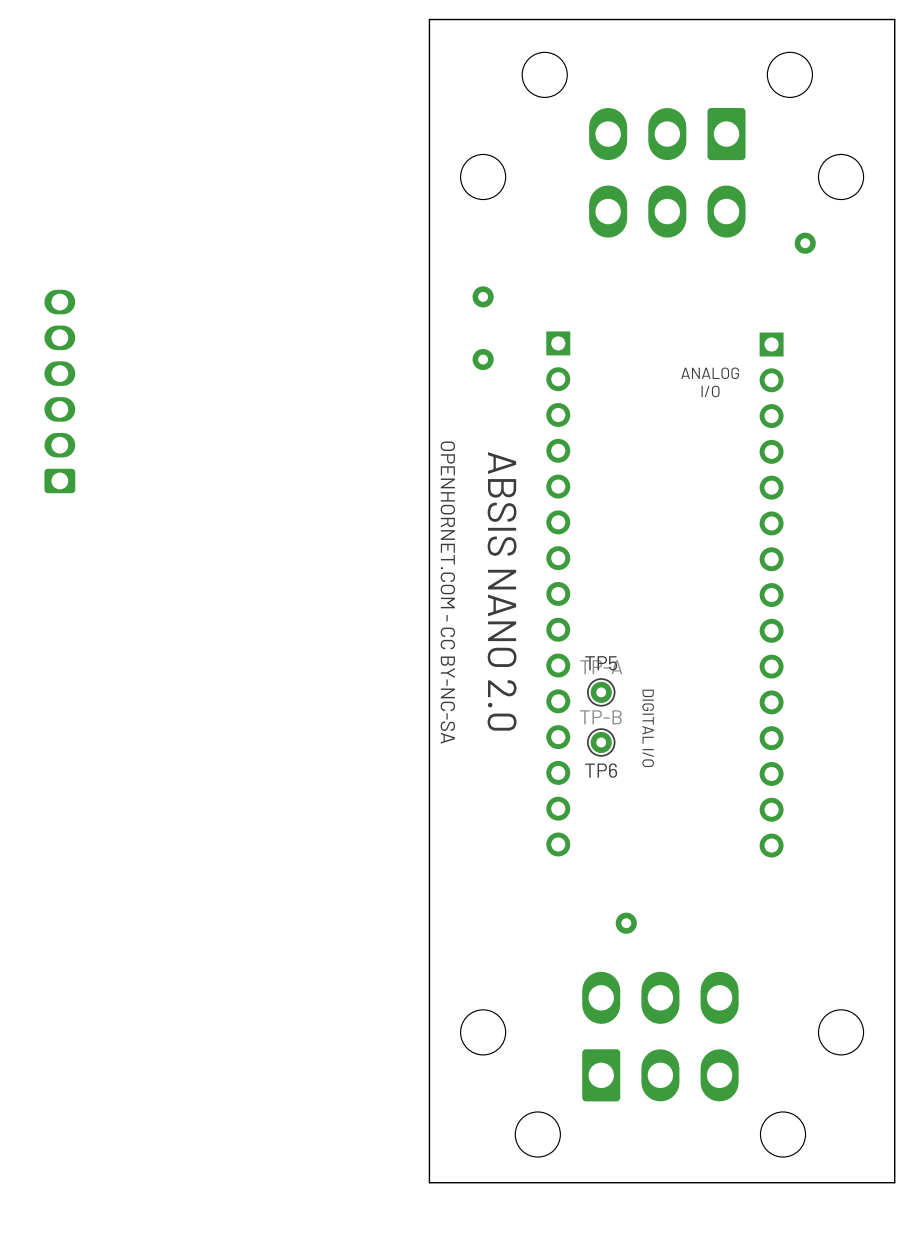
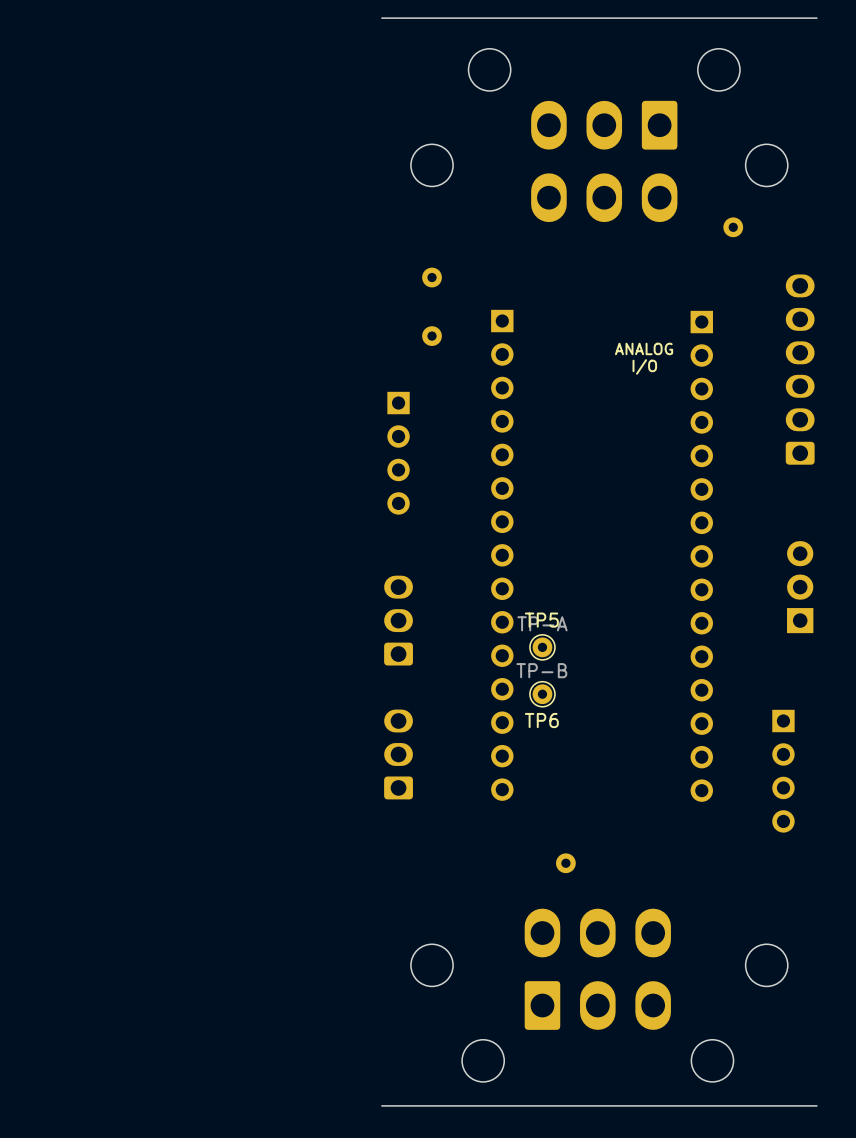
board edge: (429, 19) (429, 1182) -> none
board edge: (894, 19) (894, 1182) -> none
part: (59, 391) -> none
part: none -> (800, 369)
part: none -> (398, 453)
text: ABSIS NANO 2.0 (502, 591) -> none
text: OPENHORNET.COM - CC BY-NC-SA (447, 592) -> none
part: none -> (800, 587)
part: none -> (398, 620)
text: DIGITAL I/O (648, 728) -> none
part: none -> (398, 754)
part: none -> (783, 771)

